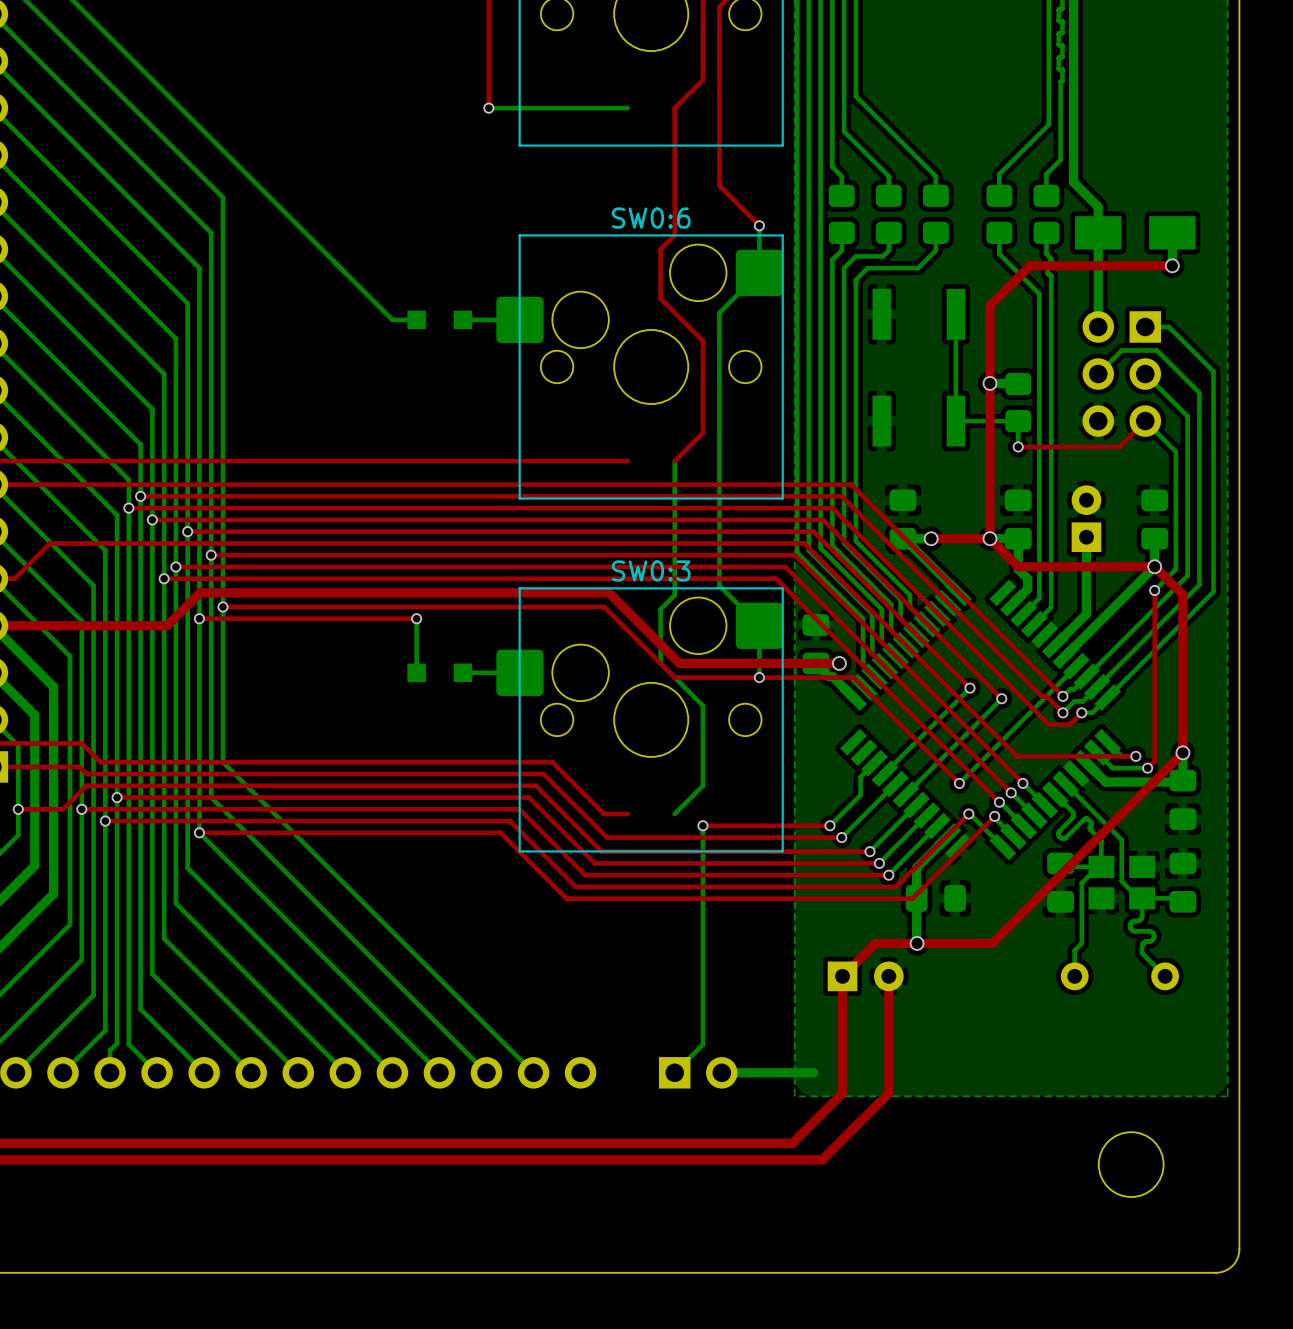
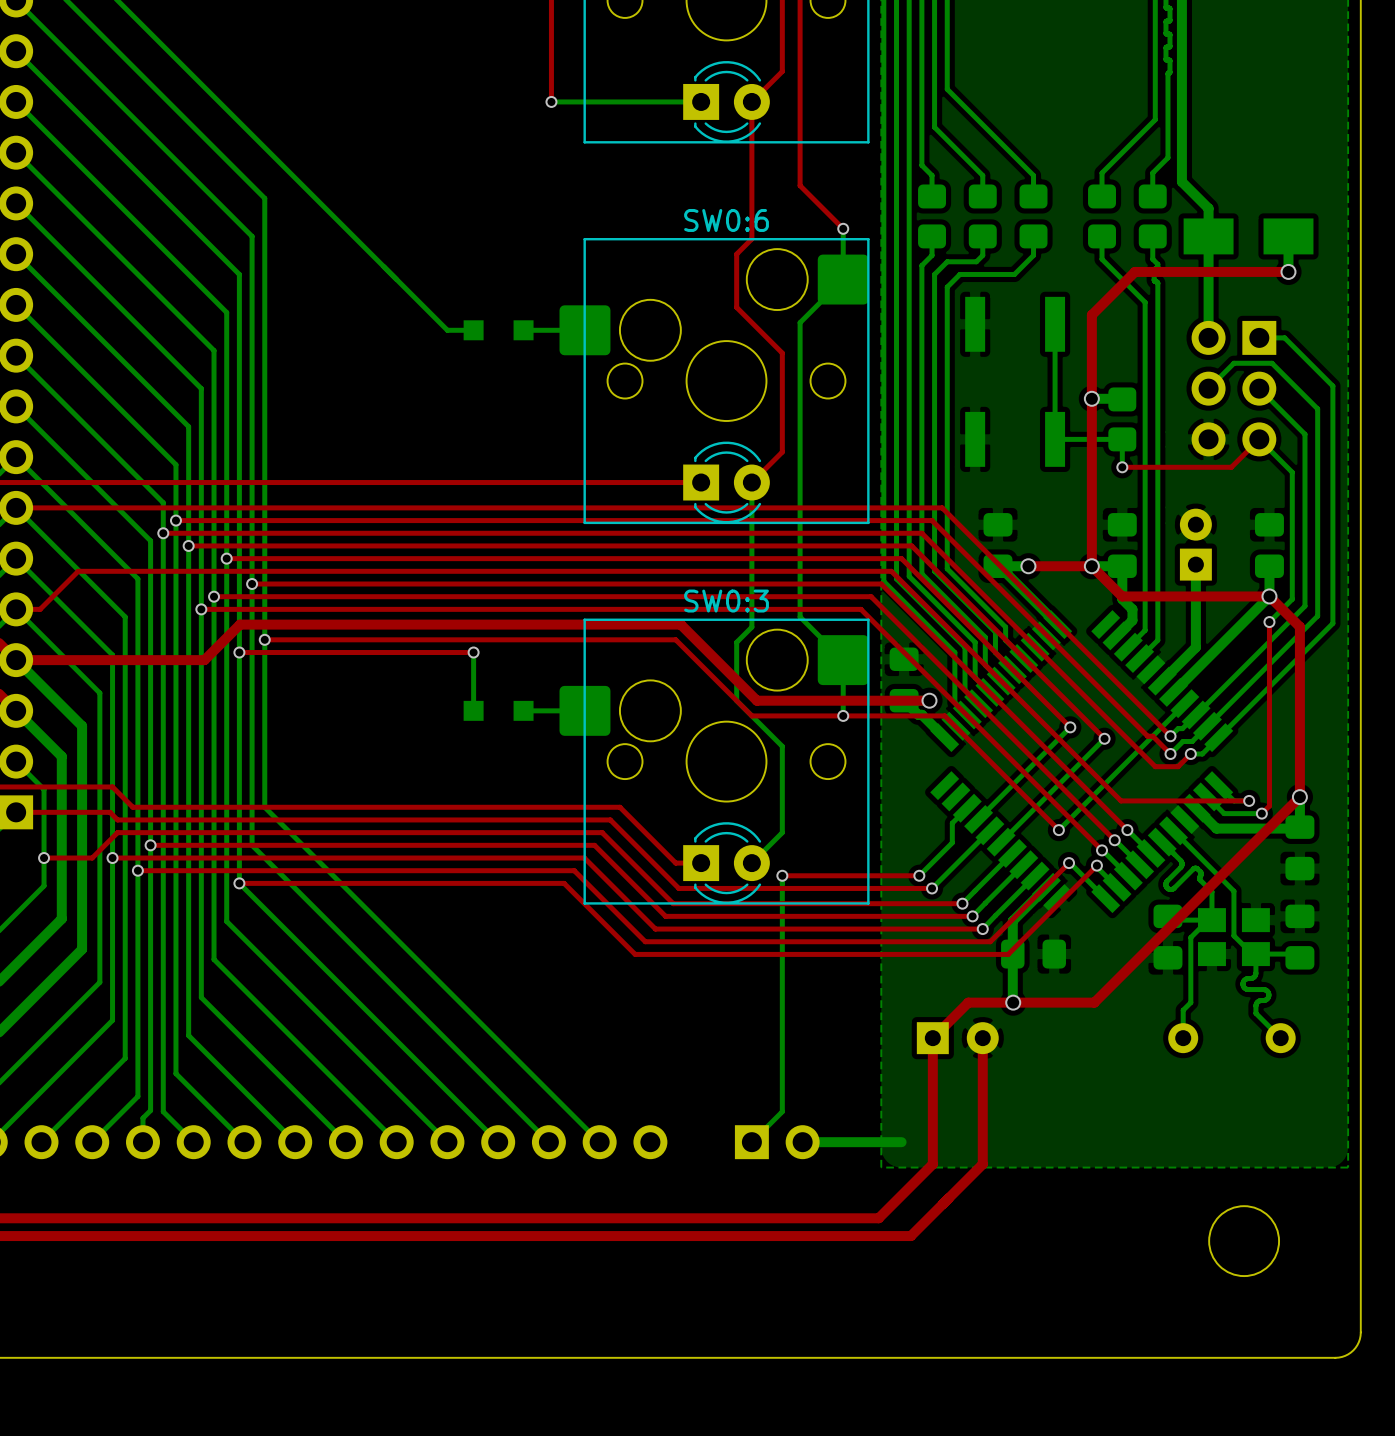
part: none -> (726, 101)
part: none -> (726, 482)
part: none -> (726, 863)

